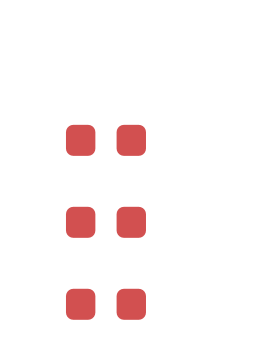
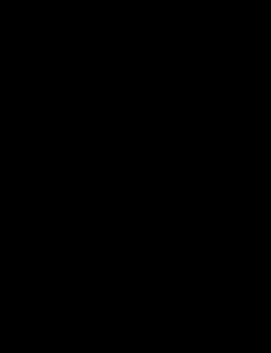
part: (105, 140) -> none
part: (105, 222) -> none
part: (105, 304) -> none

